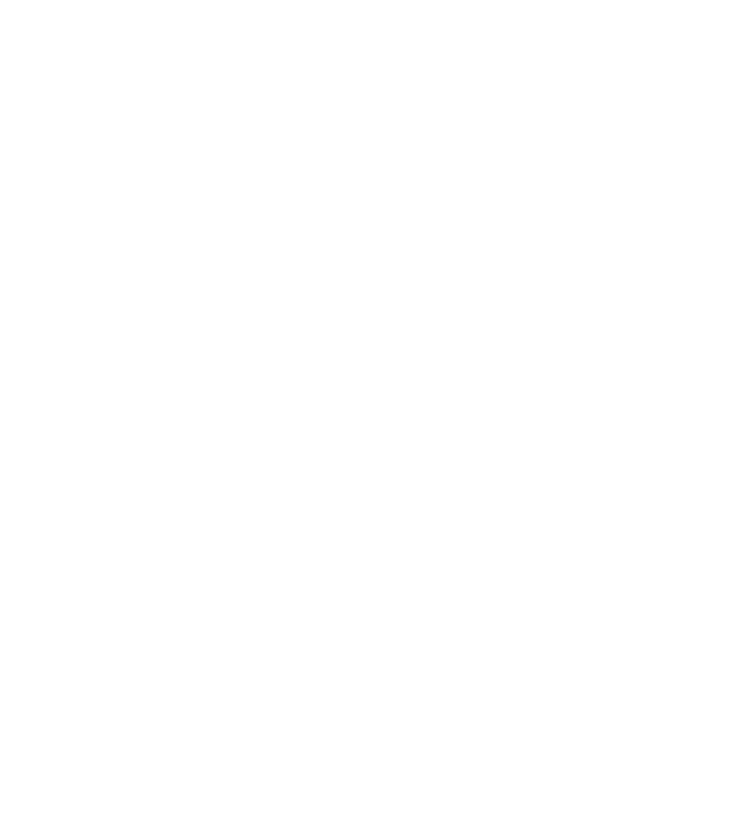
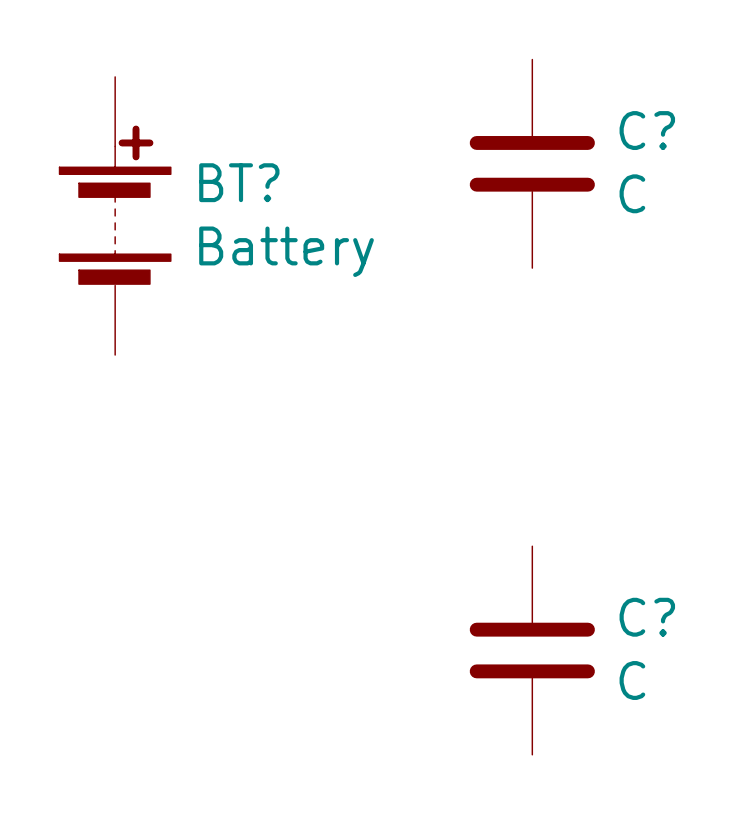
C?: none -> C (532, 163)
BT?: none -> Battery (115, 215)
C?: none -> C (532, 650)

